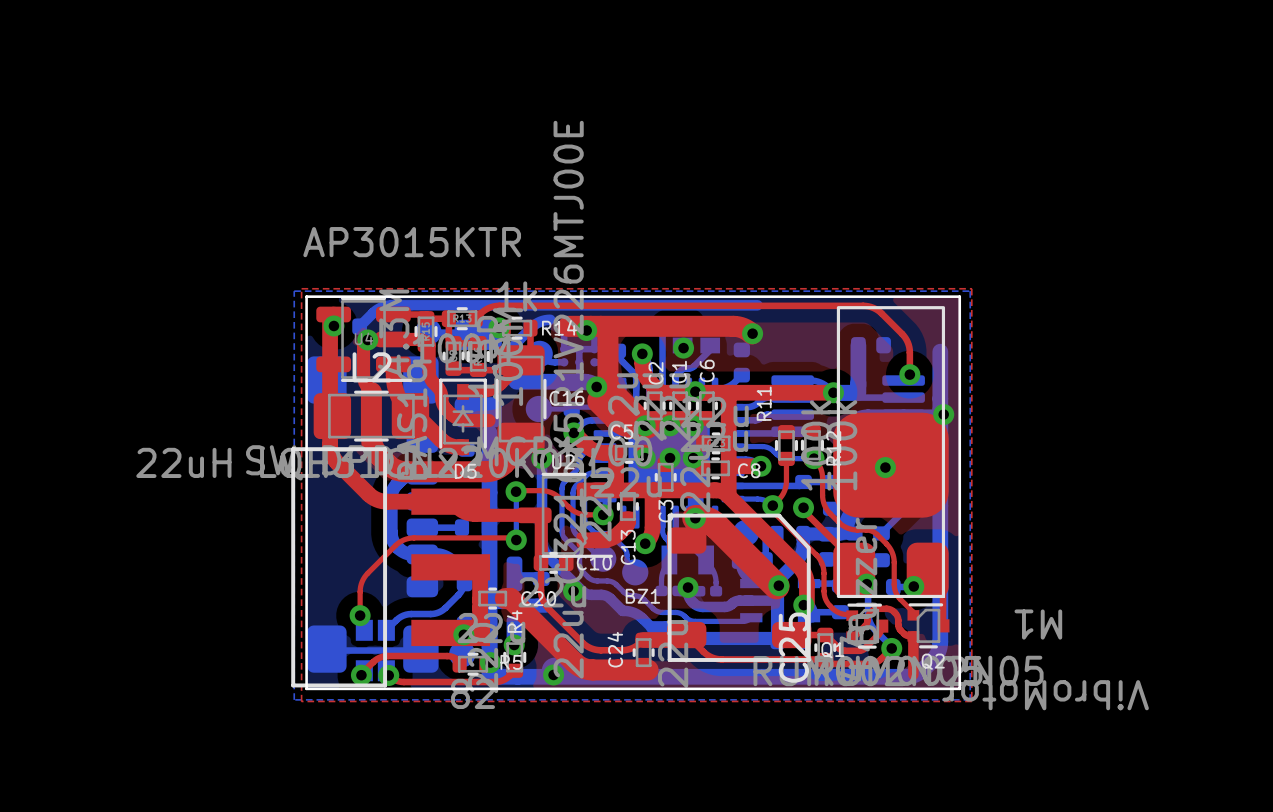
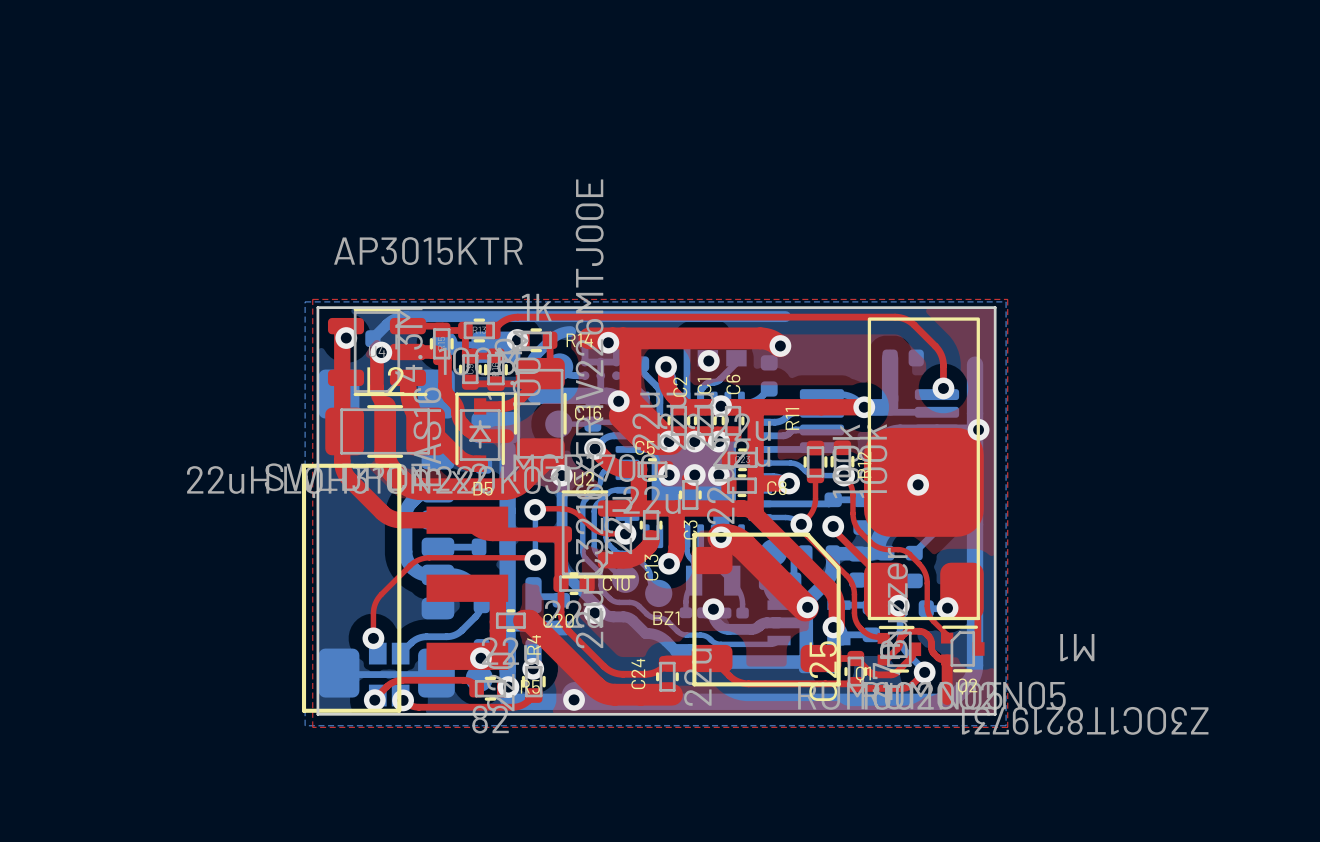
M1 value: VibroMotor (1045, 695) -> Z3OC1T8219731 (1085, 720)

